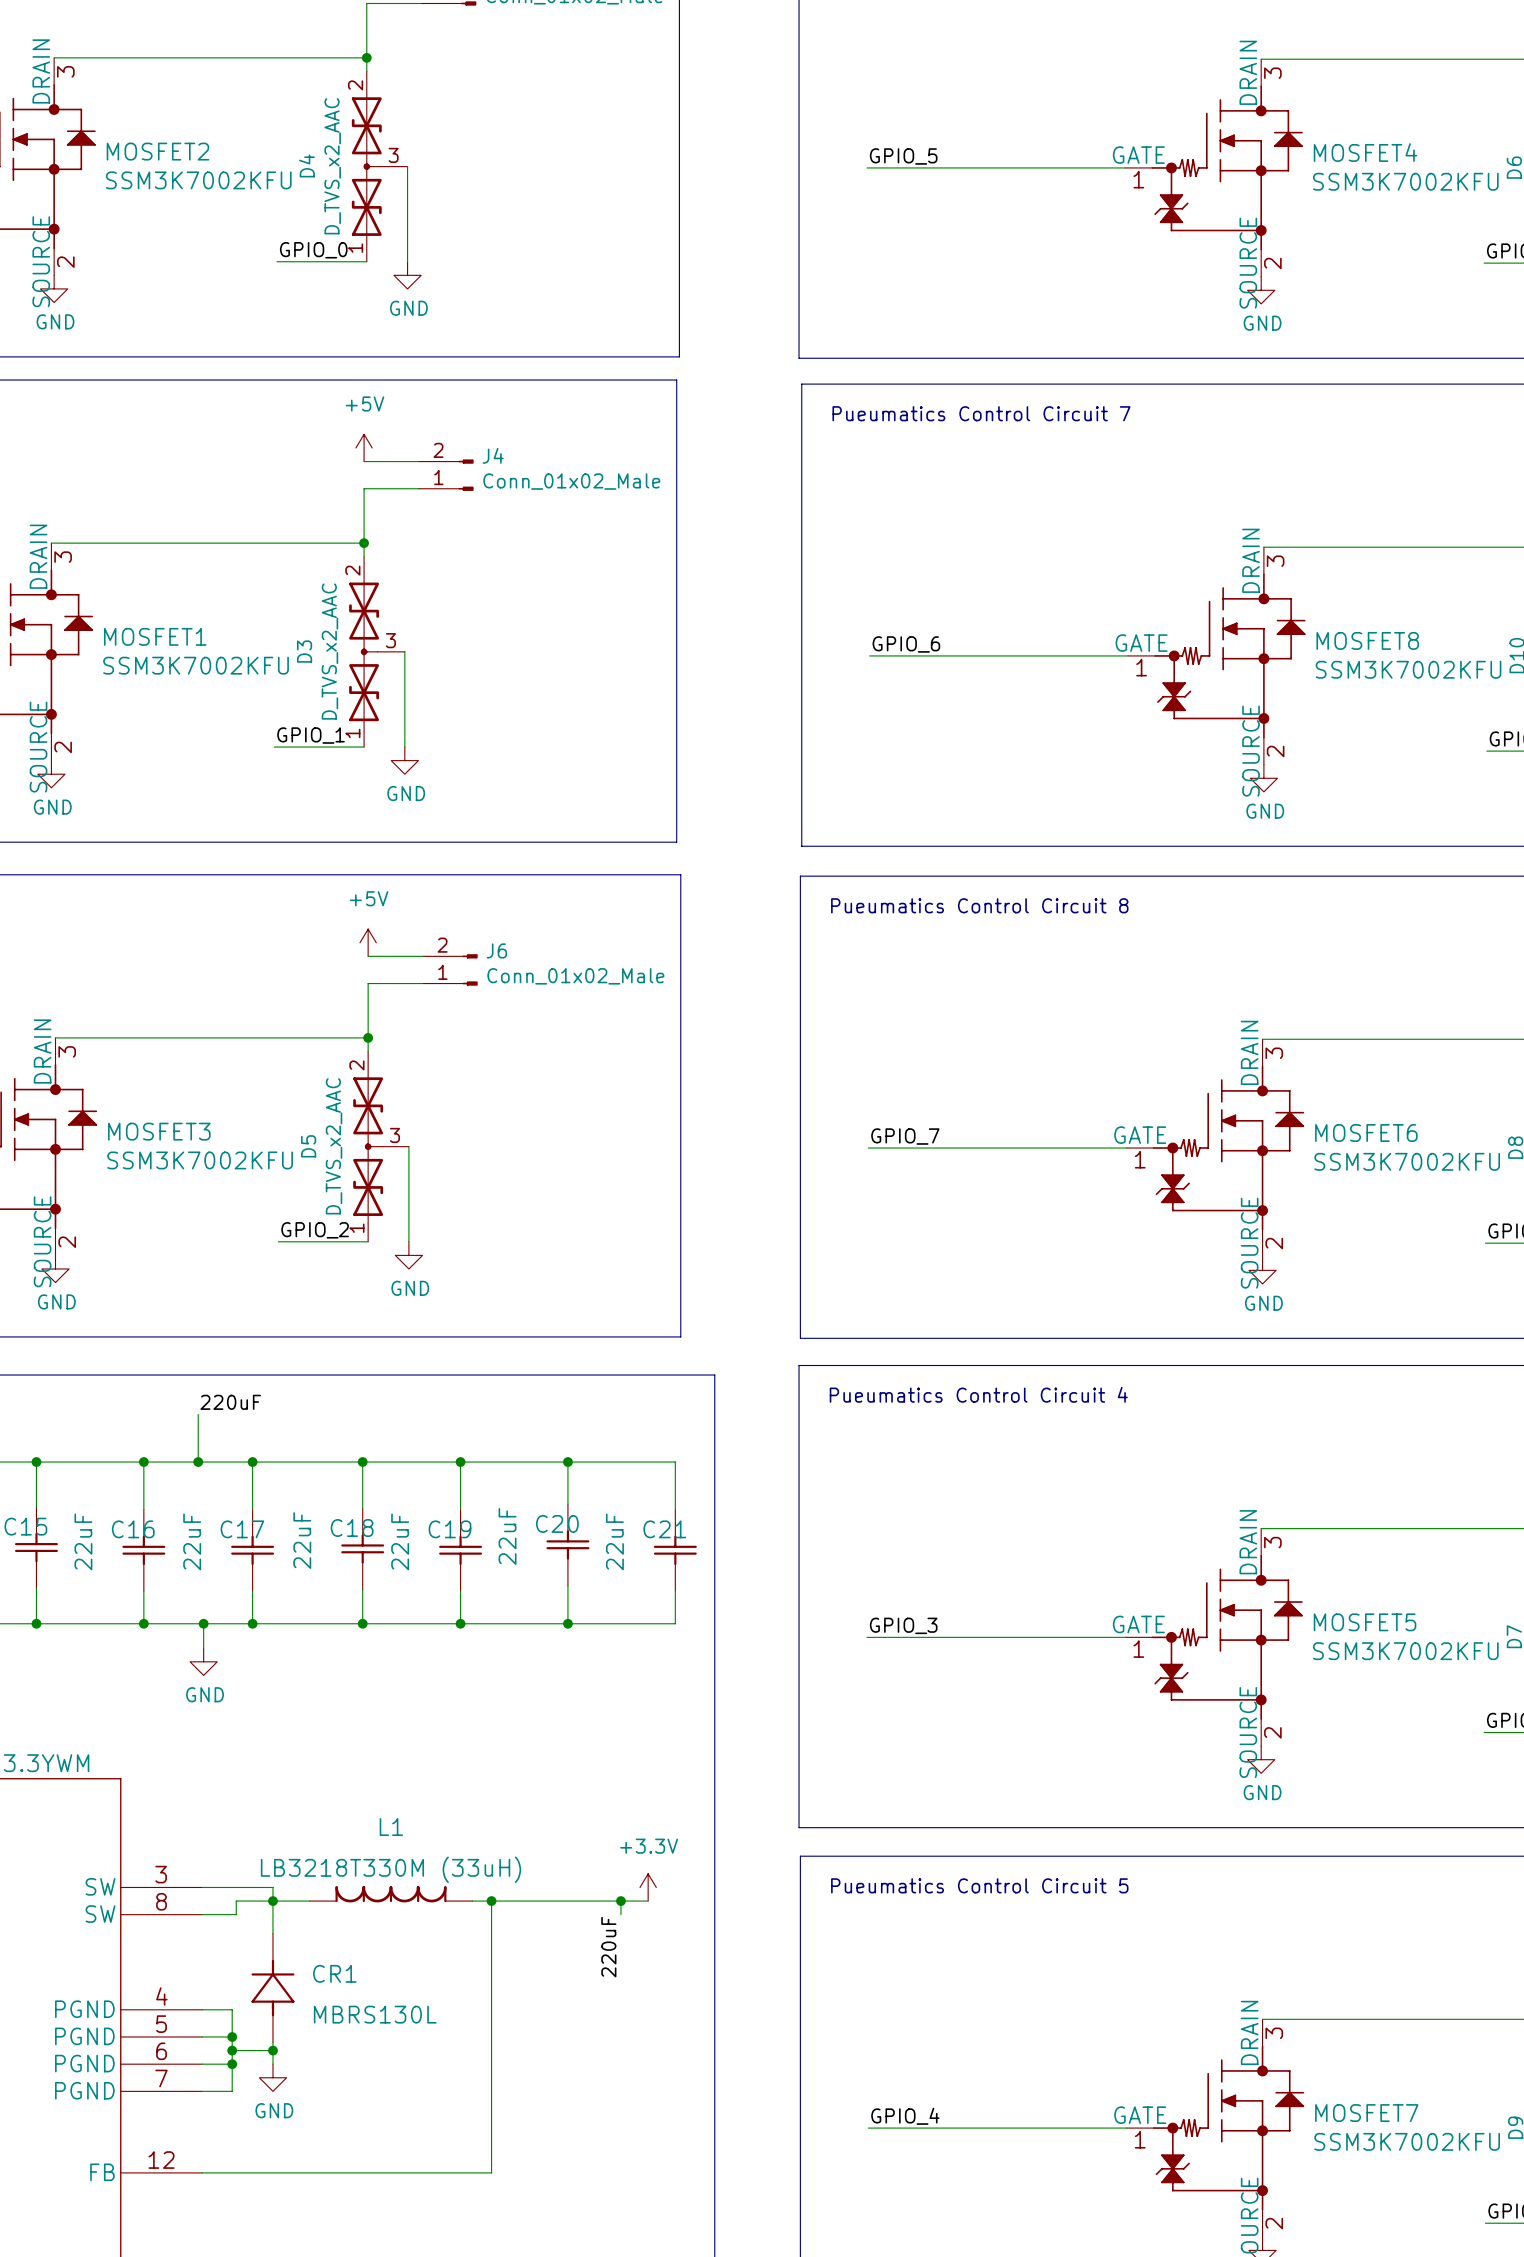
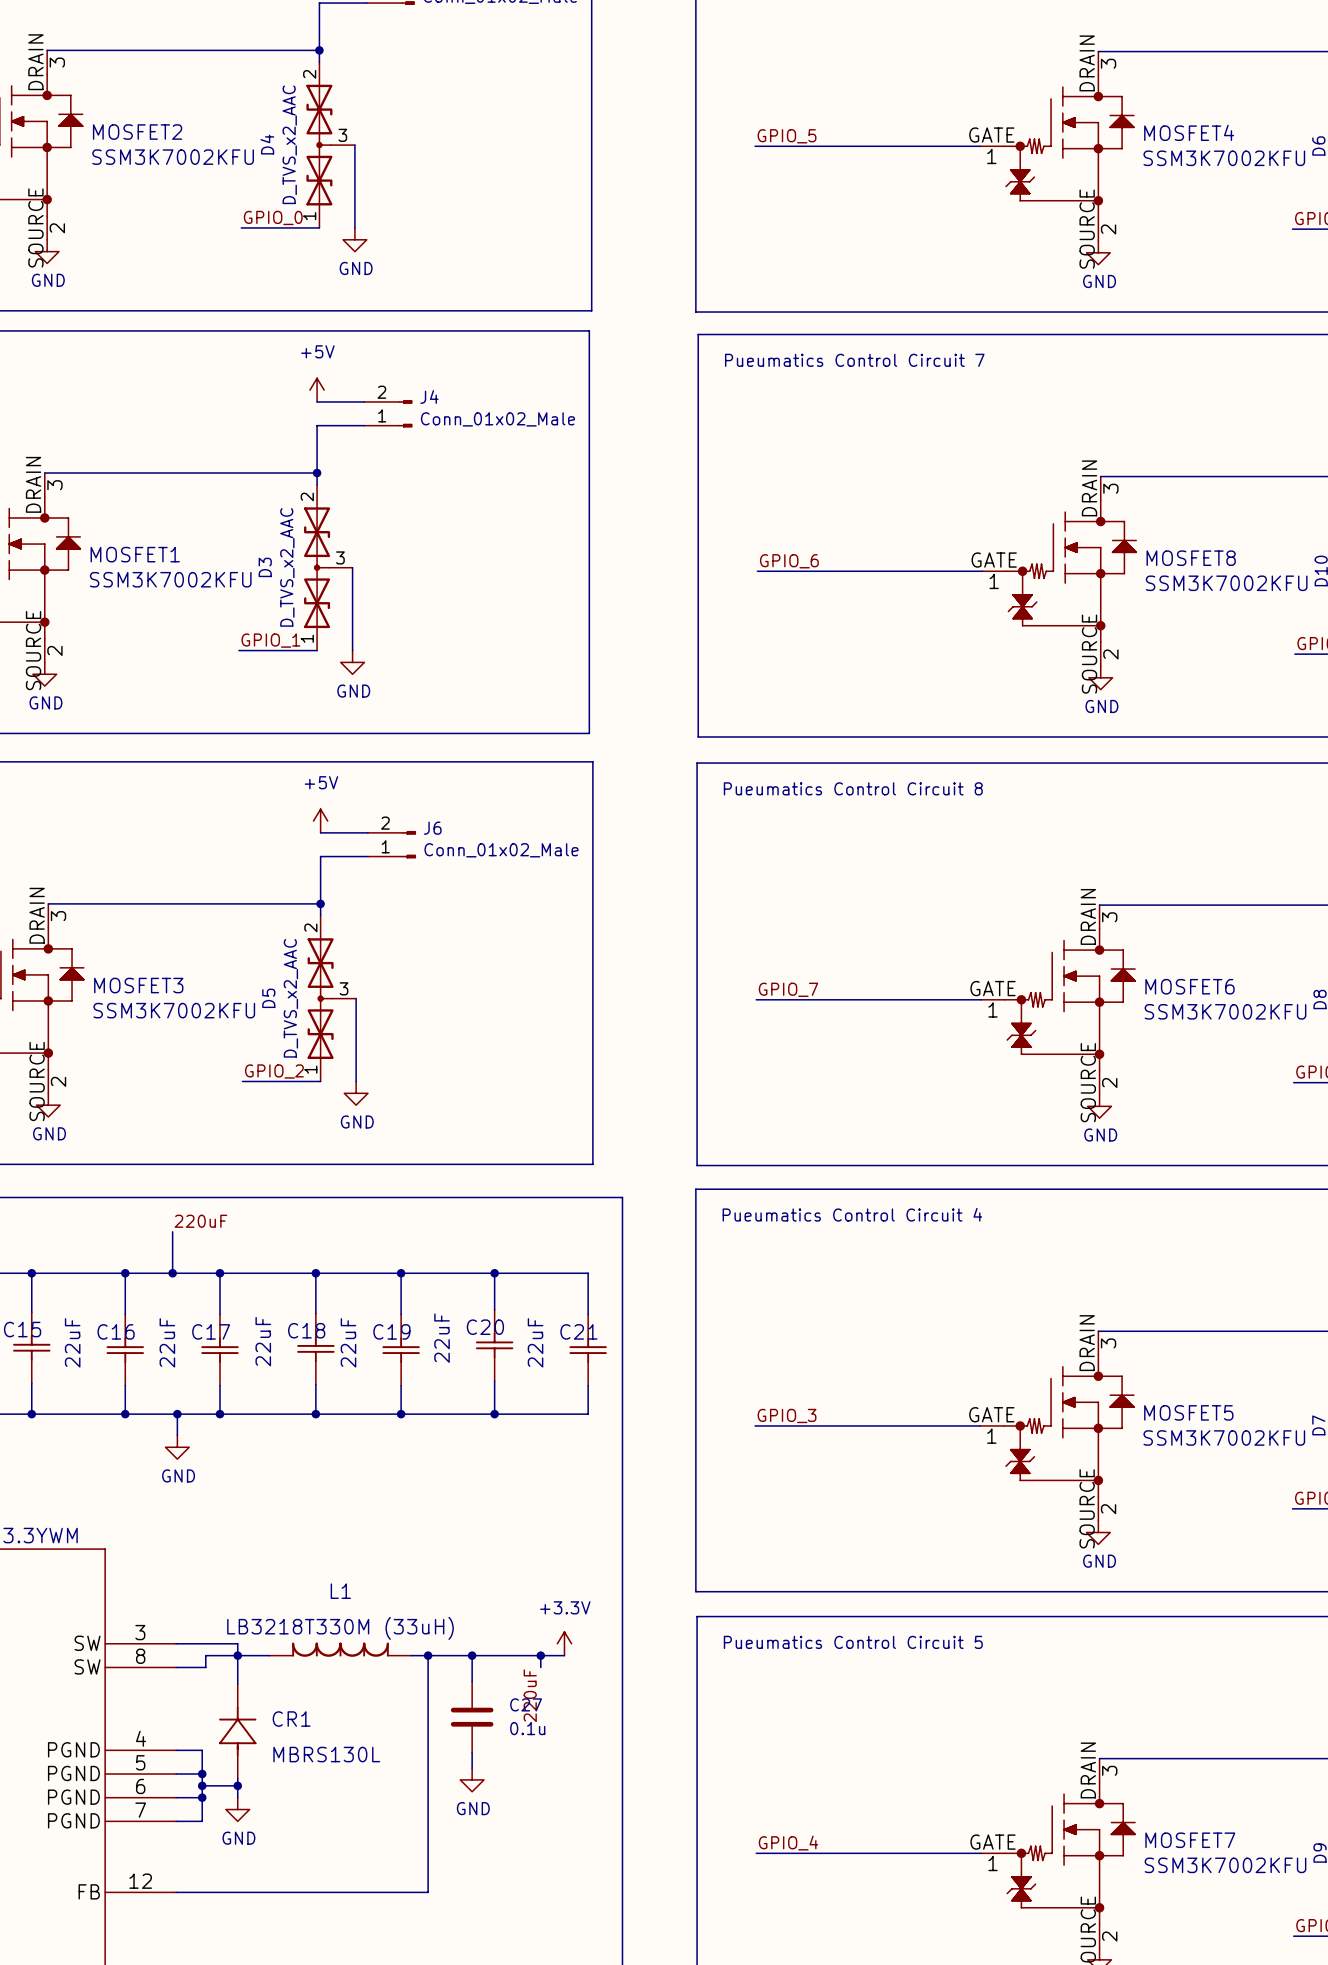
wire: none -> (472, 1655) (472, 1681)
junction: none -> (472, 1655)
C27: none -> 0.1u (472, 1717)
wire: none -> (472, 1752) (472, 1768)
power symbol: none -> GND (472, 1779)

